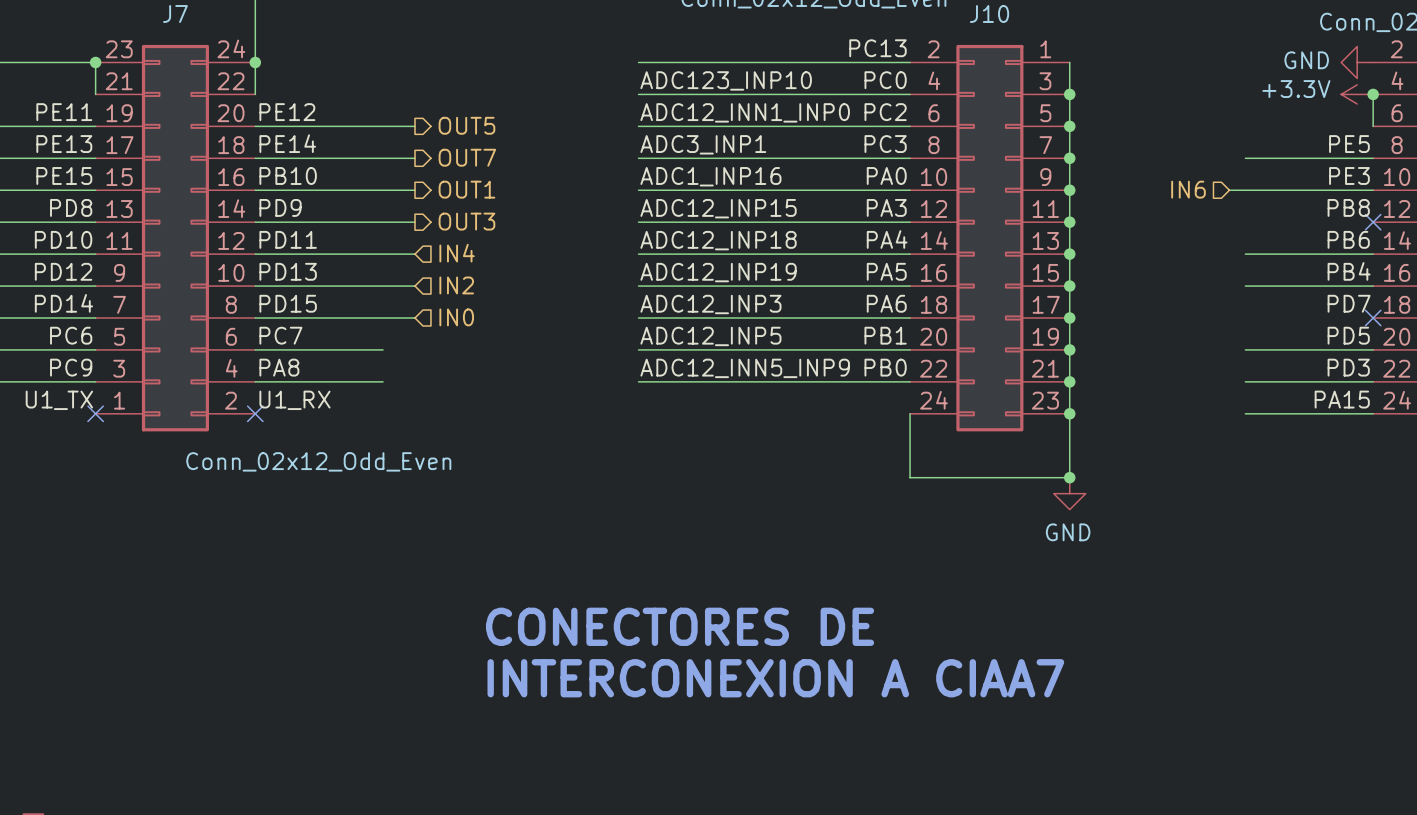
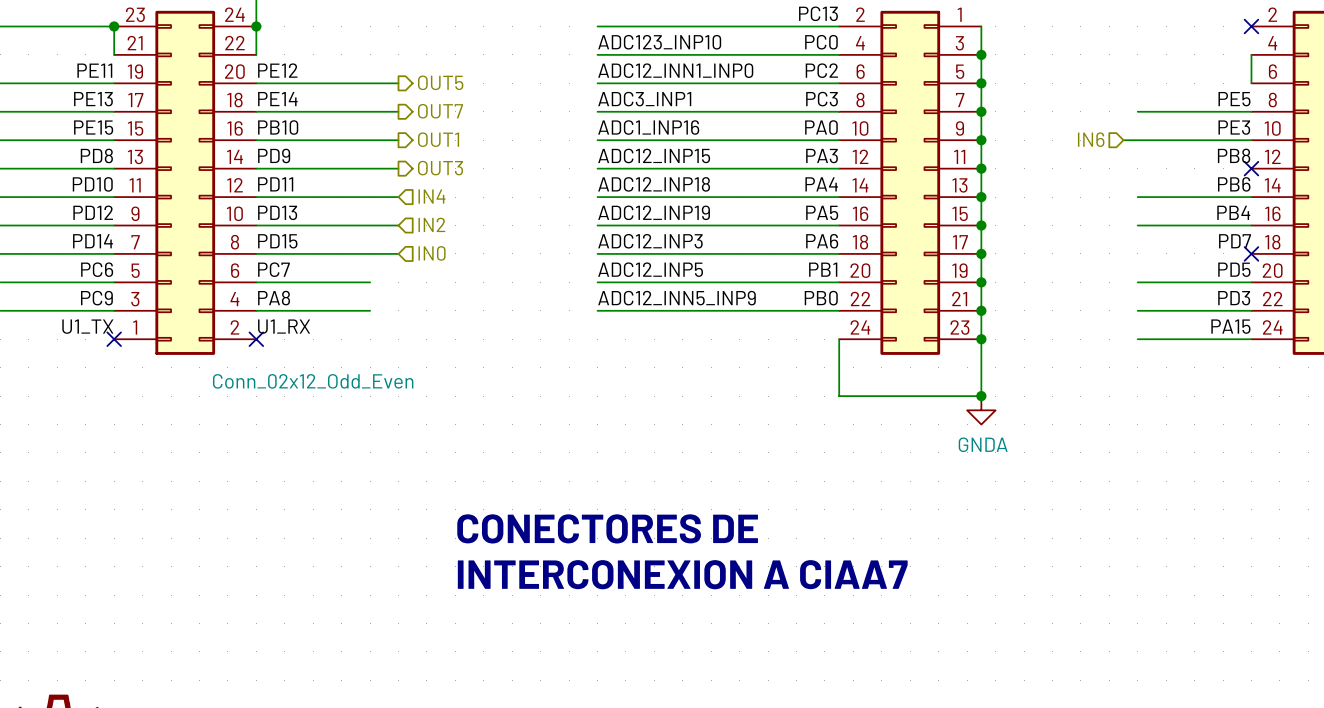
power symbol: GND (1357, 62) -> none
no-connect mark: none -> (1251, 26)
power symbol: +3.3V (1357, 94) -> none
junction: (1373, 94) -> none
power symbol: GND (1069, 493) -> GNDA (981, 410)

